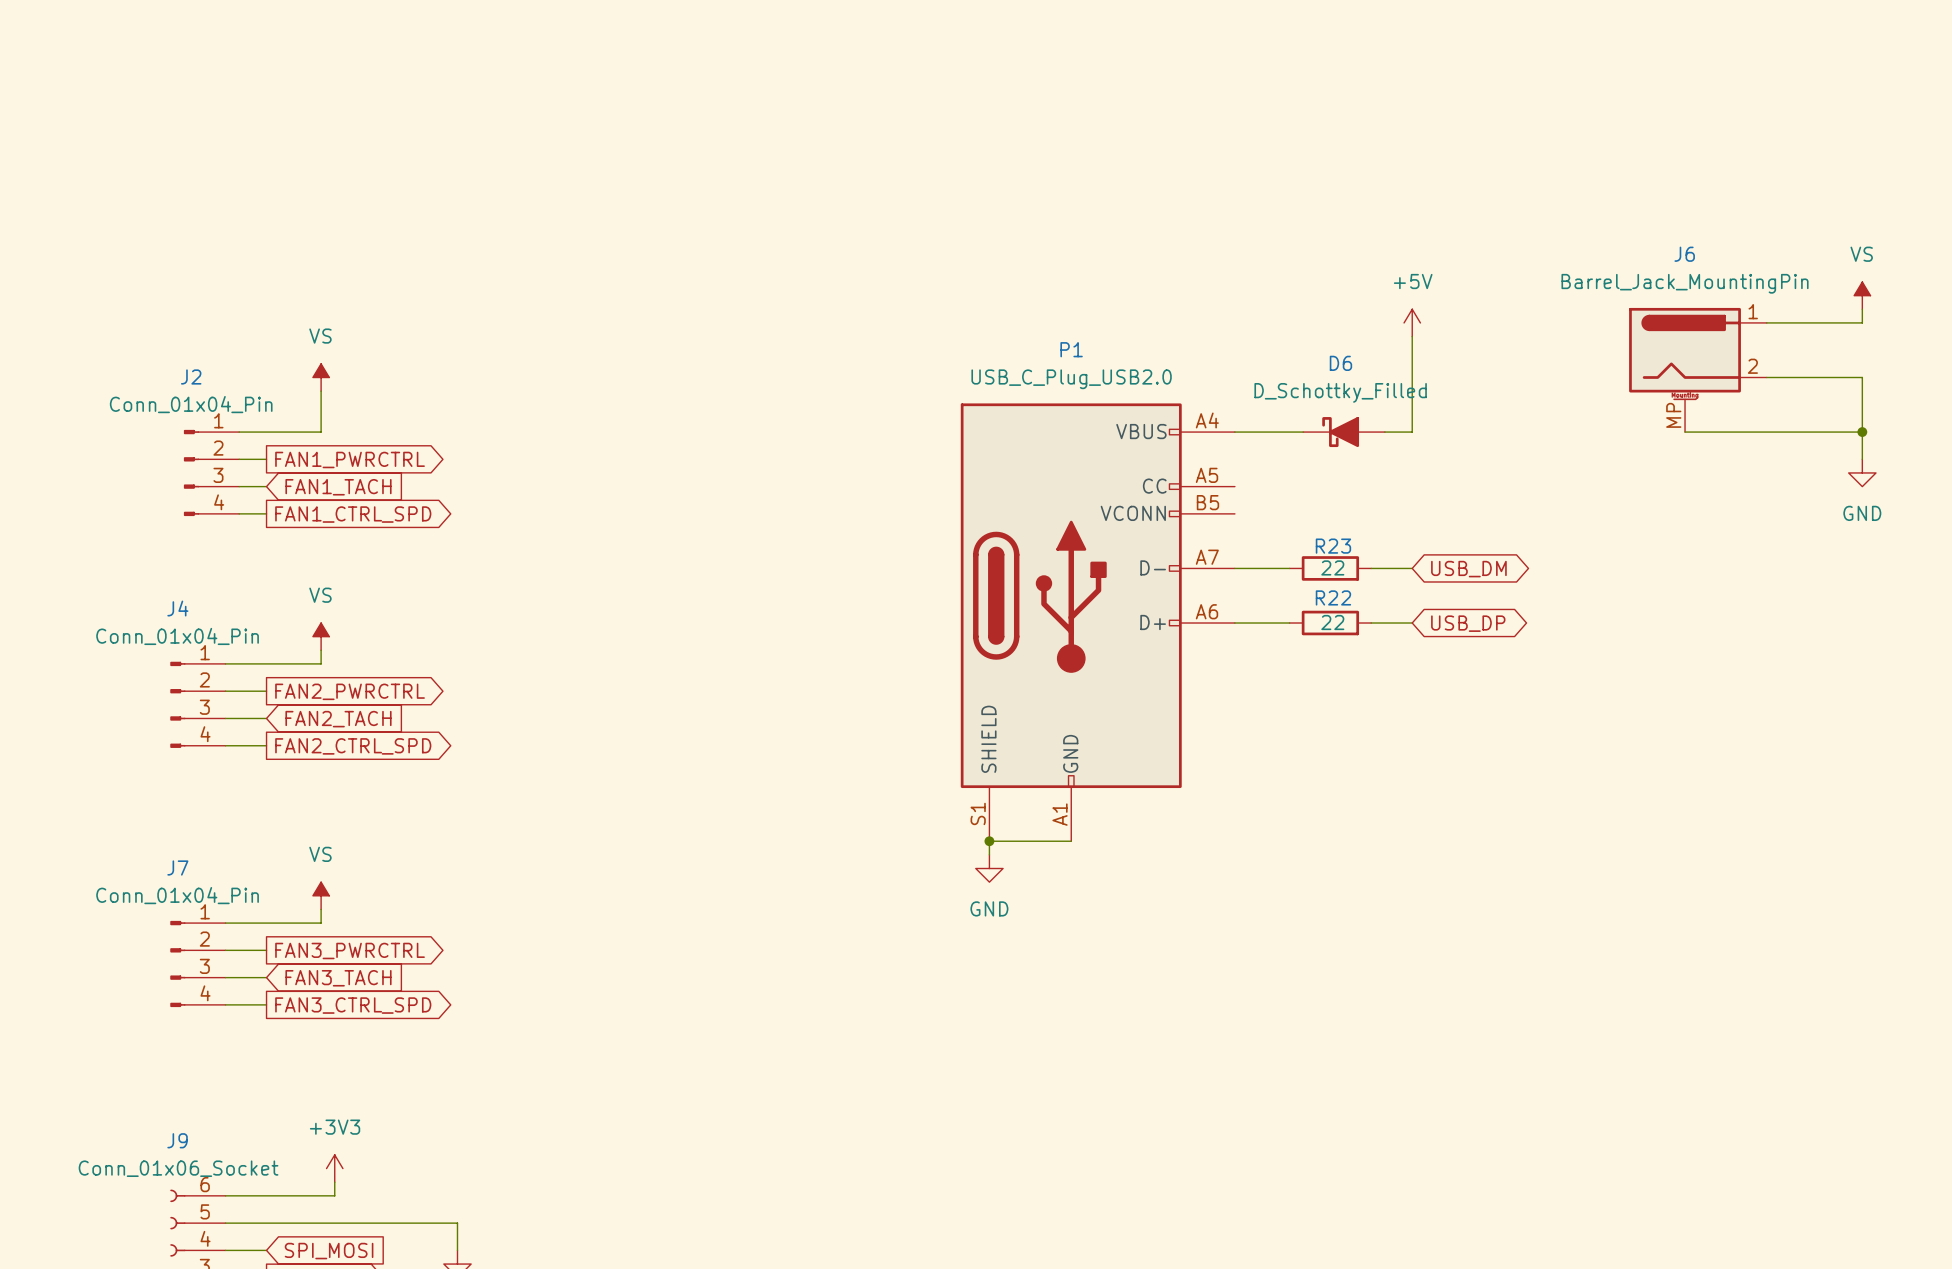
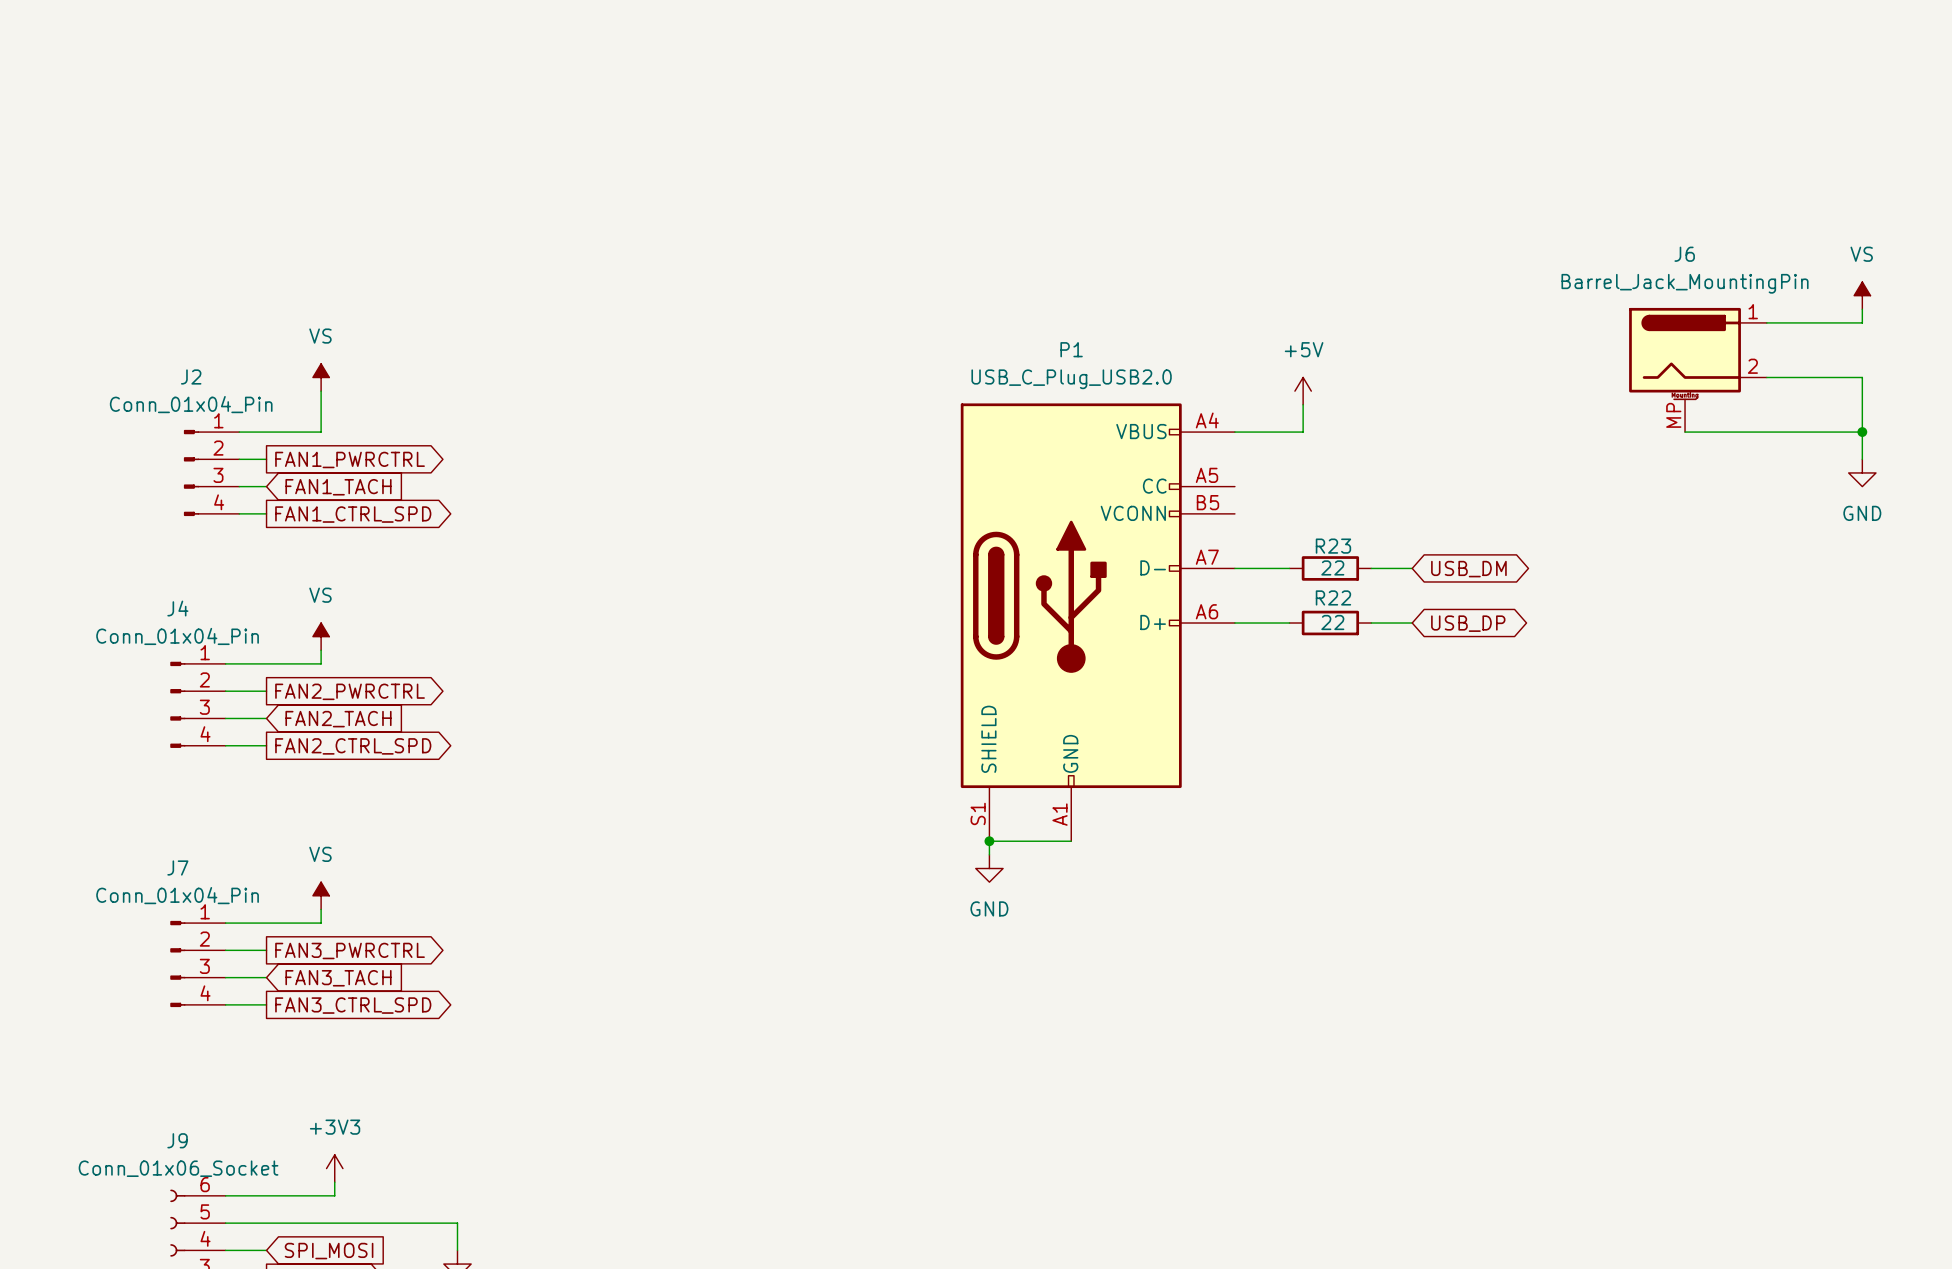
power symbol position: +5V (1412, 322) -> +5V (1303, 391)
wire: (1412, 336) (1412, 432) (1384, 432) -> none
wire: none -> (1303, 404) (1303, 432)
D6: D_Schottky_Filled (1344, 432) -> none

